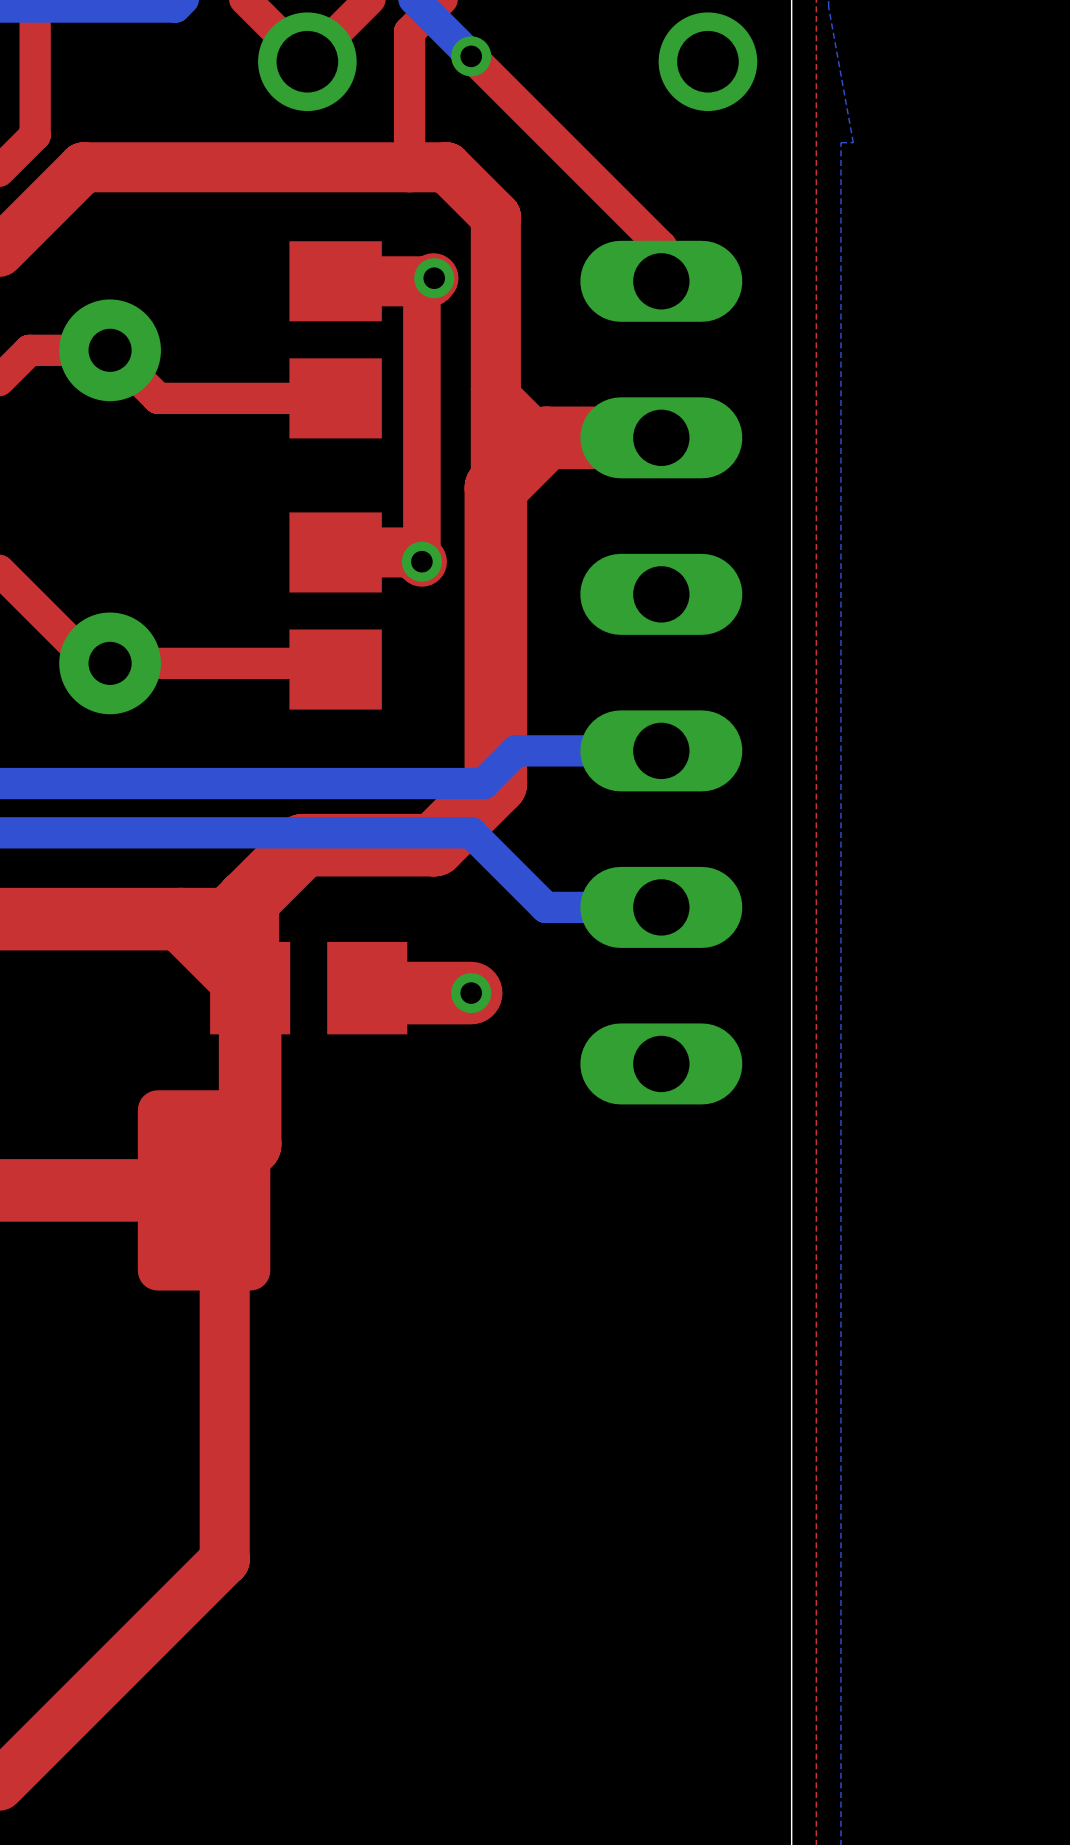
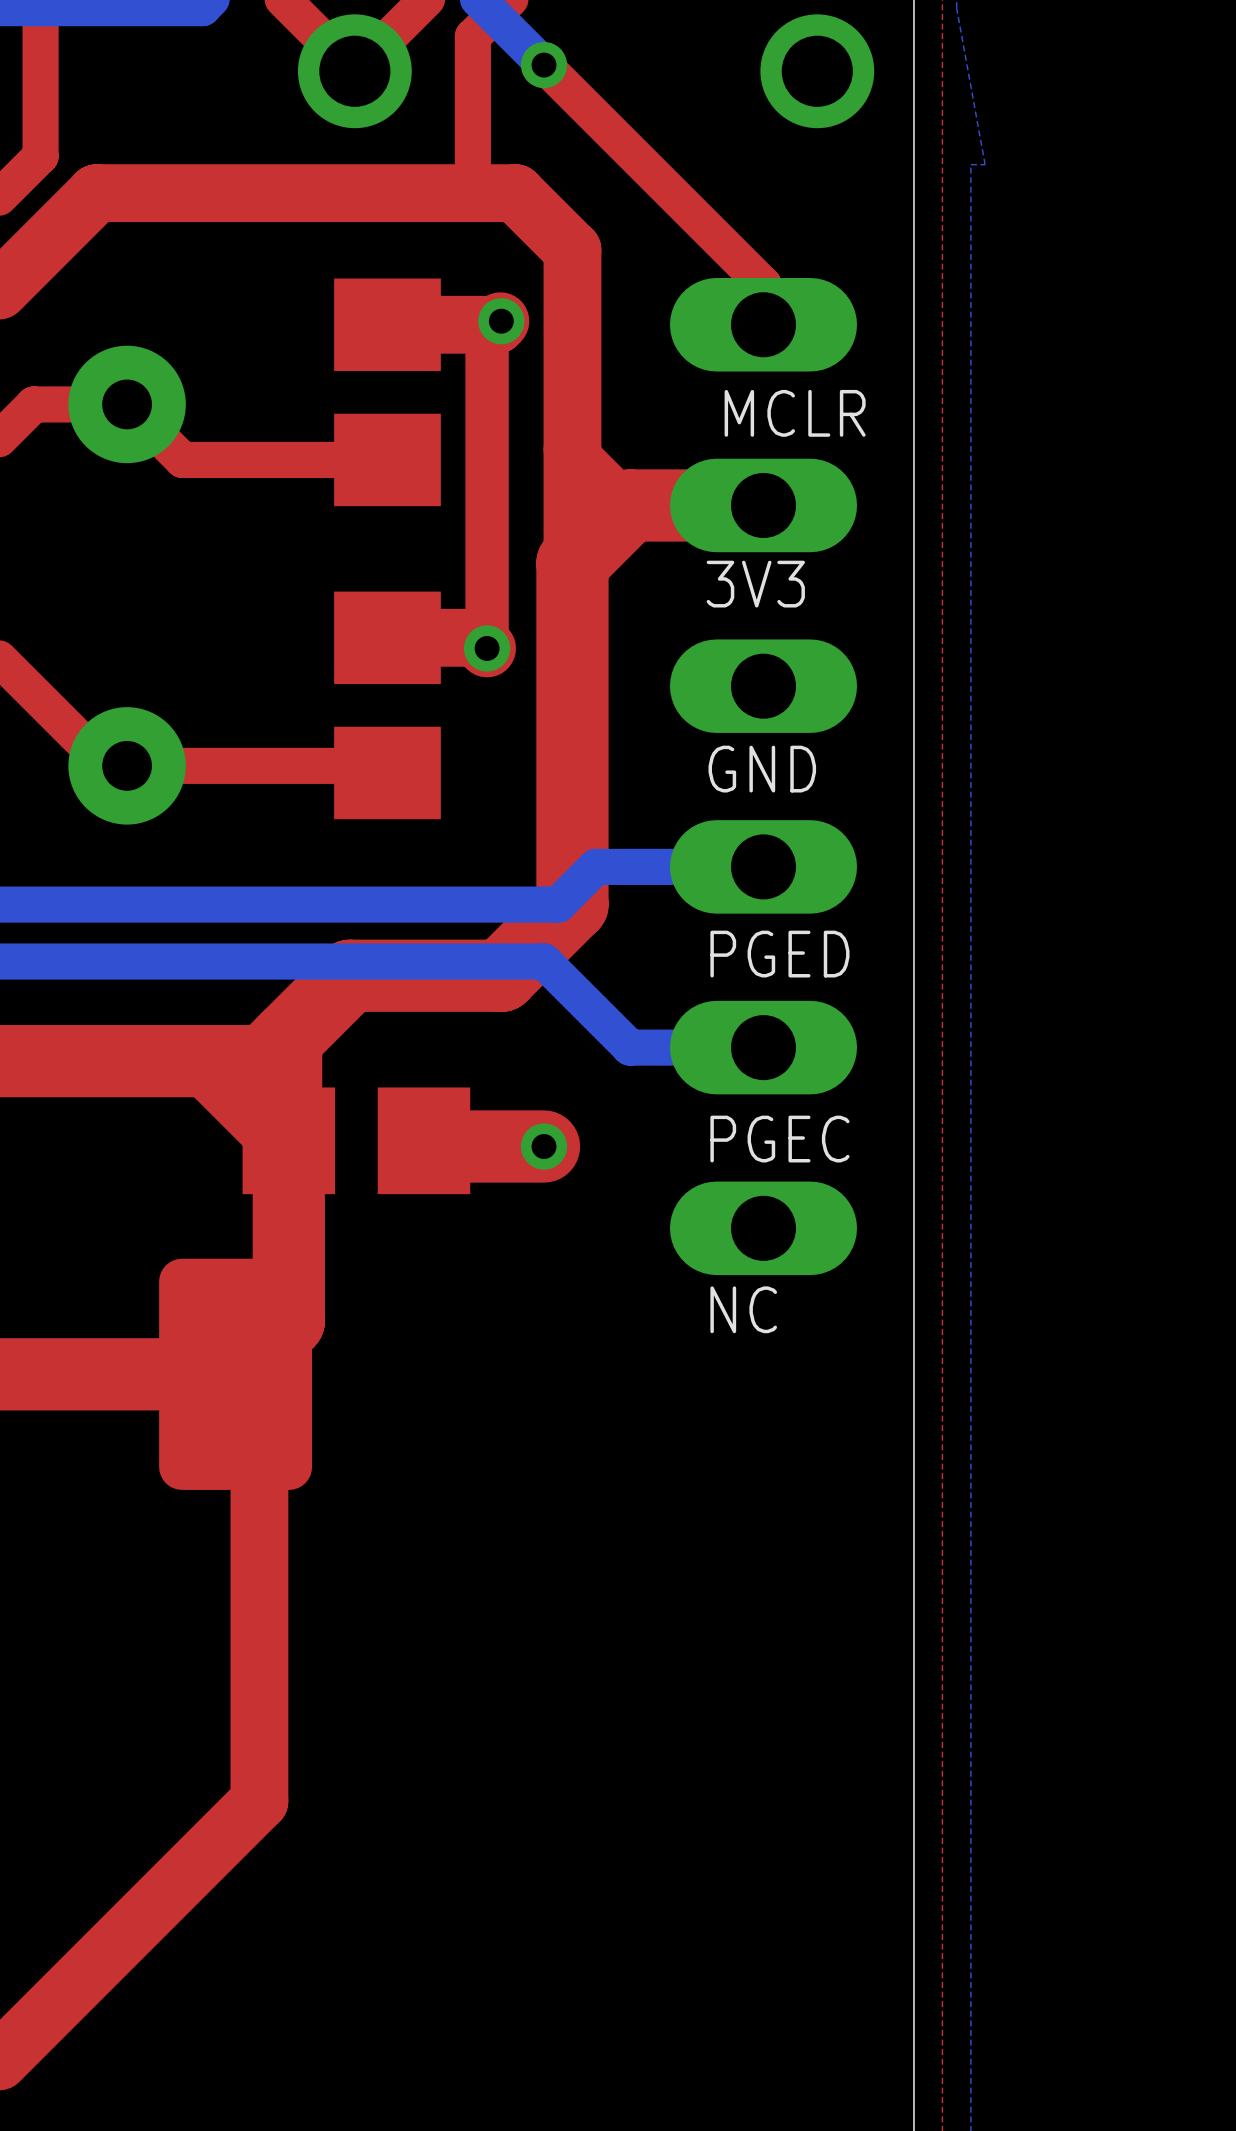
text: none -> MCLR (795, 413)
text: none -> 3V3 (755, 584)
text: none -> GND (762, 769)
text: none -> PGED (779, 954)
text: none -> PGEC (779, 1139)
text: none -> NC (743, 1309)

